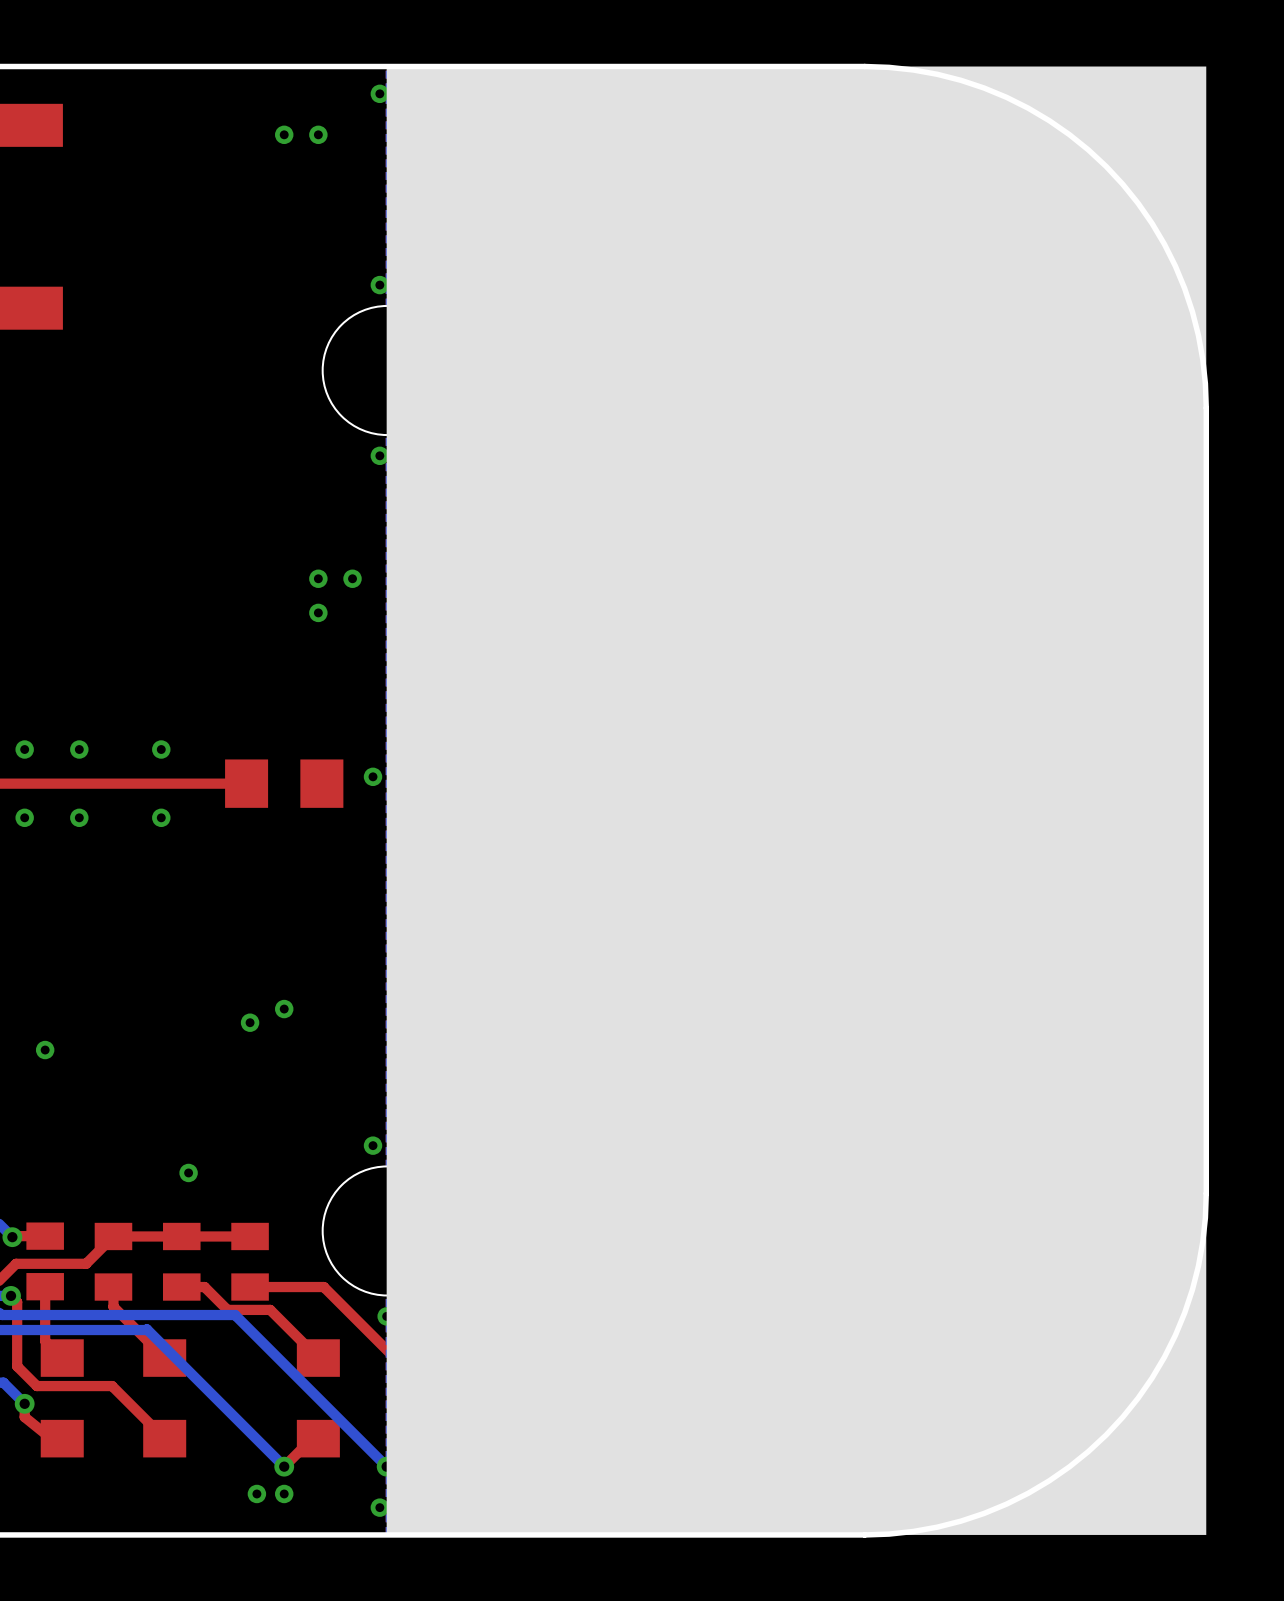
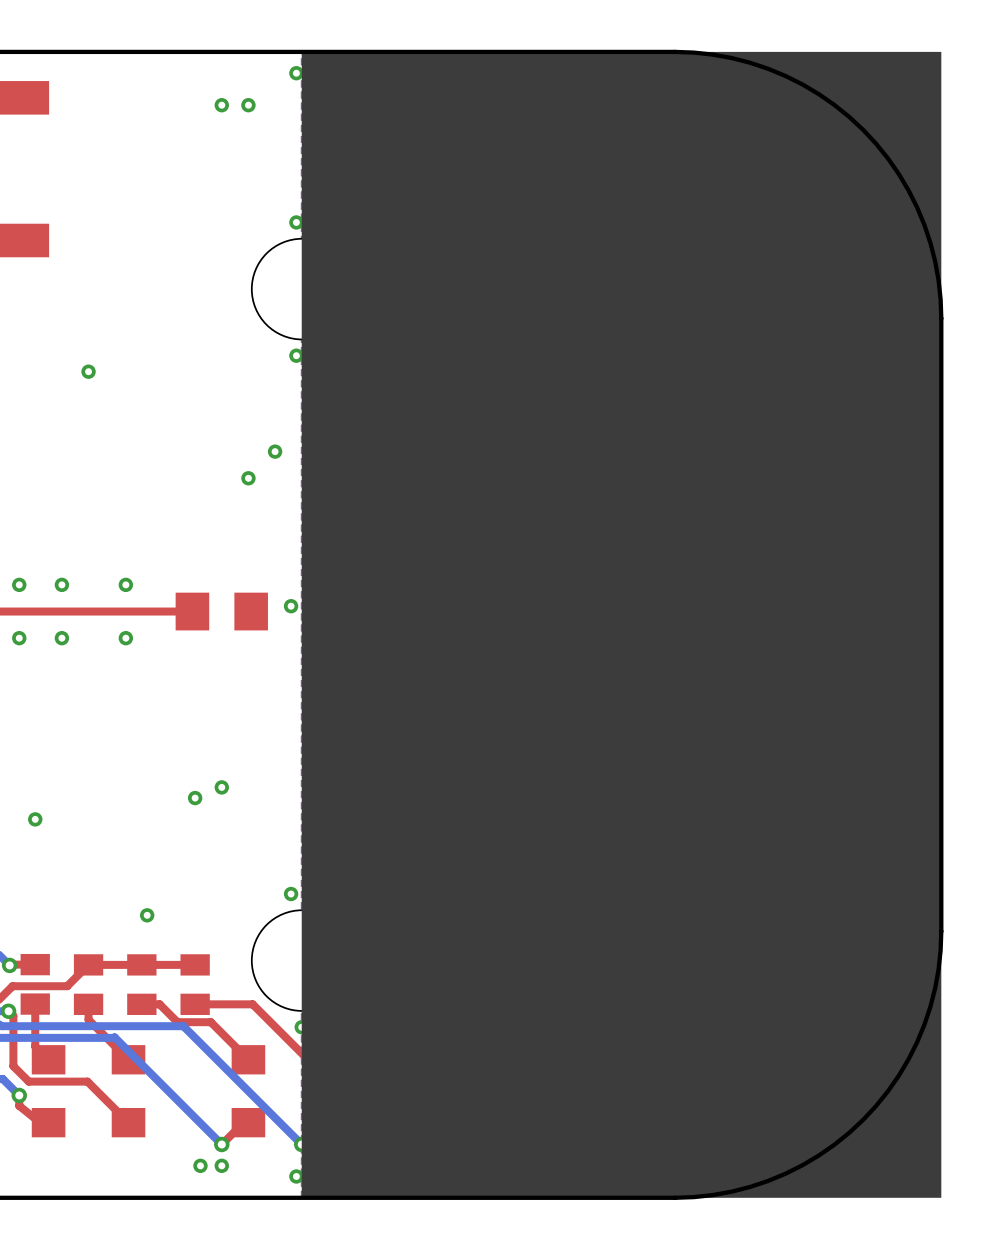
via: none -> (88, 371)
via: (318, 578) -> none

